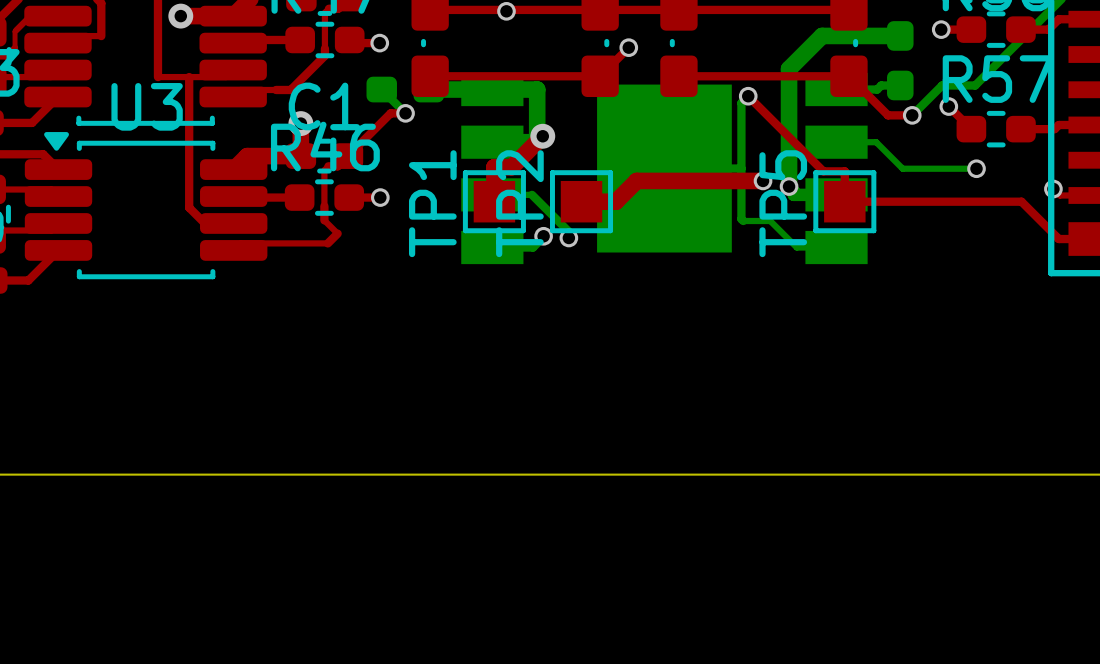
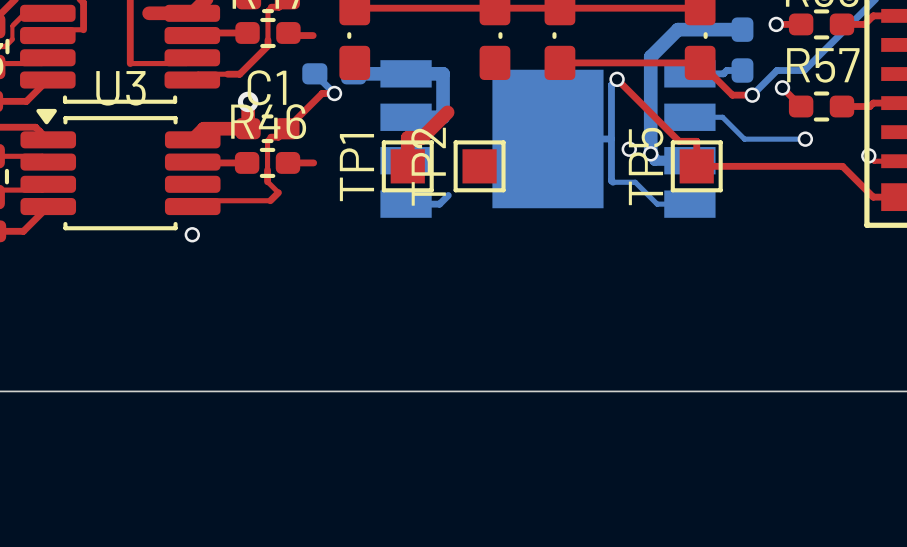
via: (506, 11) -> none
via: (180, 16) -> none
via: (379, 43) -> none
top track: (628, 47) (600, 76) (430, 76) -> none
via: (628, 47) -> none
top track: (189, 77) (189, 207) (204, 223) (233, 223) -> none
via: (542, 136) -> none
top track: (763, 180) (636, 180) (615, 201) (581, 201) -> none
bottom track: (492, 194) (532, 194) (568, 231) (568, 237) -> none
via: (380, 197) -> none
via: (543, 236) -> none
via: (568, 237) -> none
via: none -> (192, 234)

